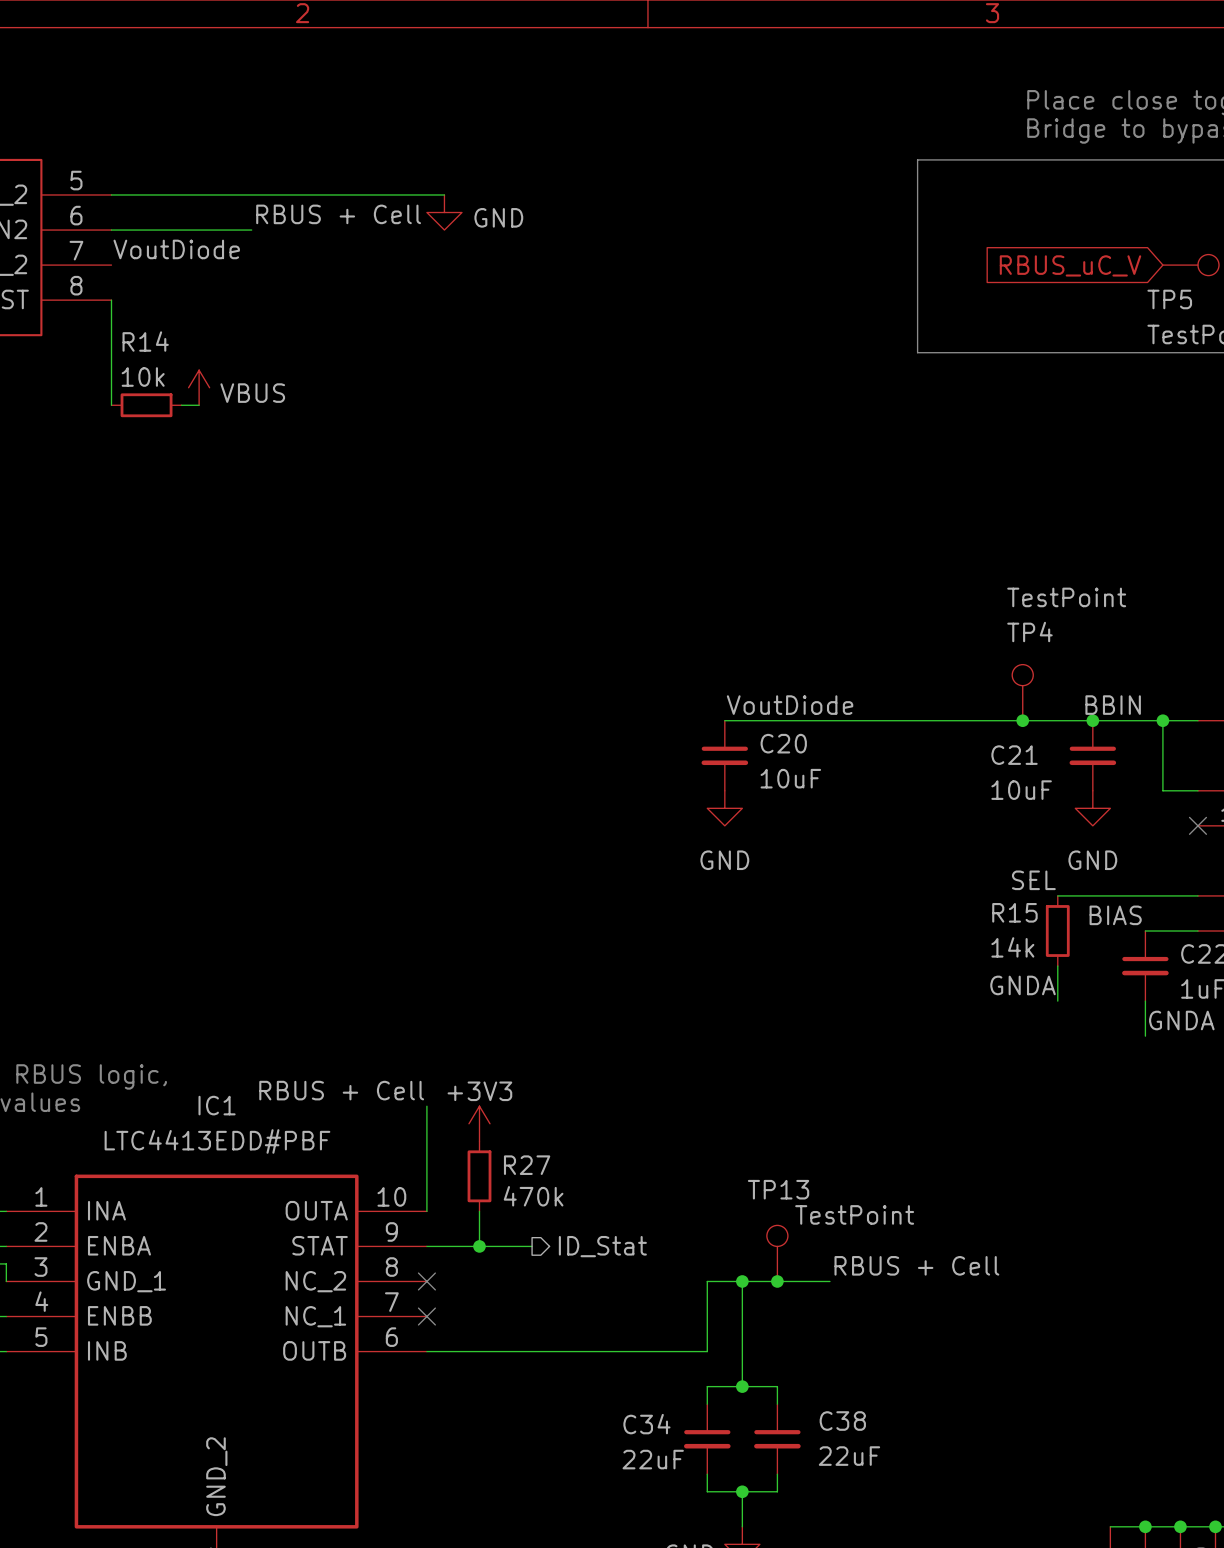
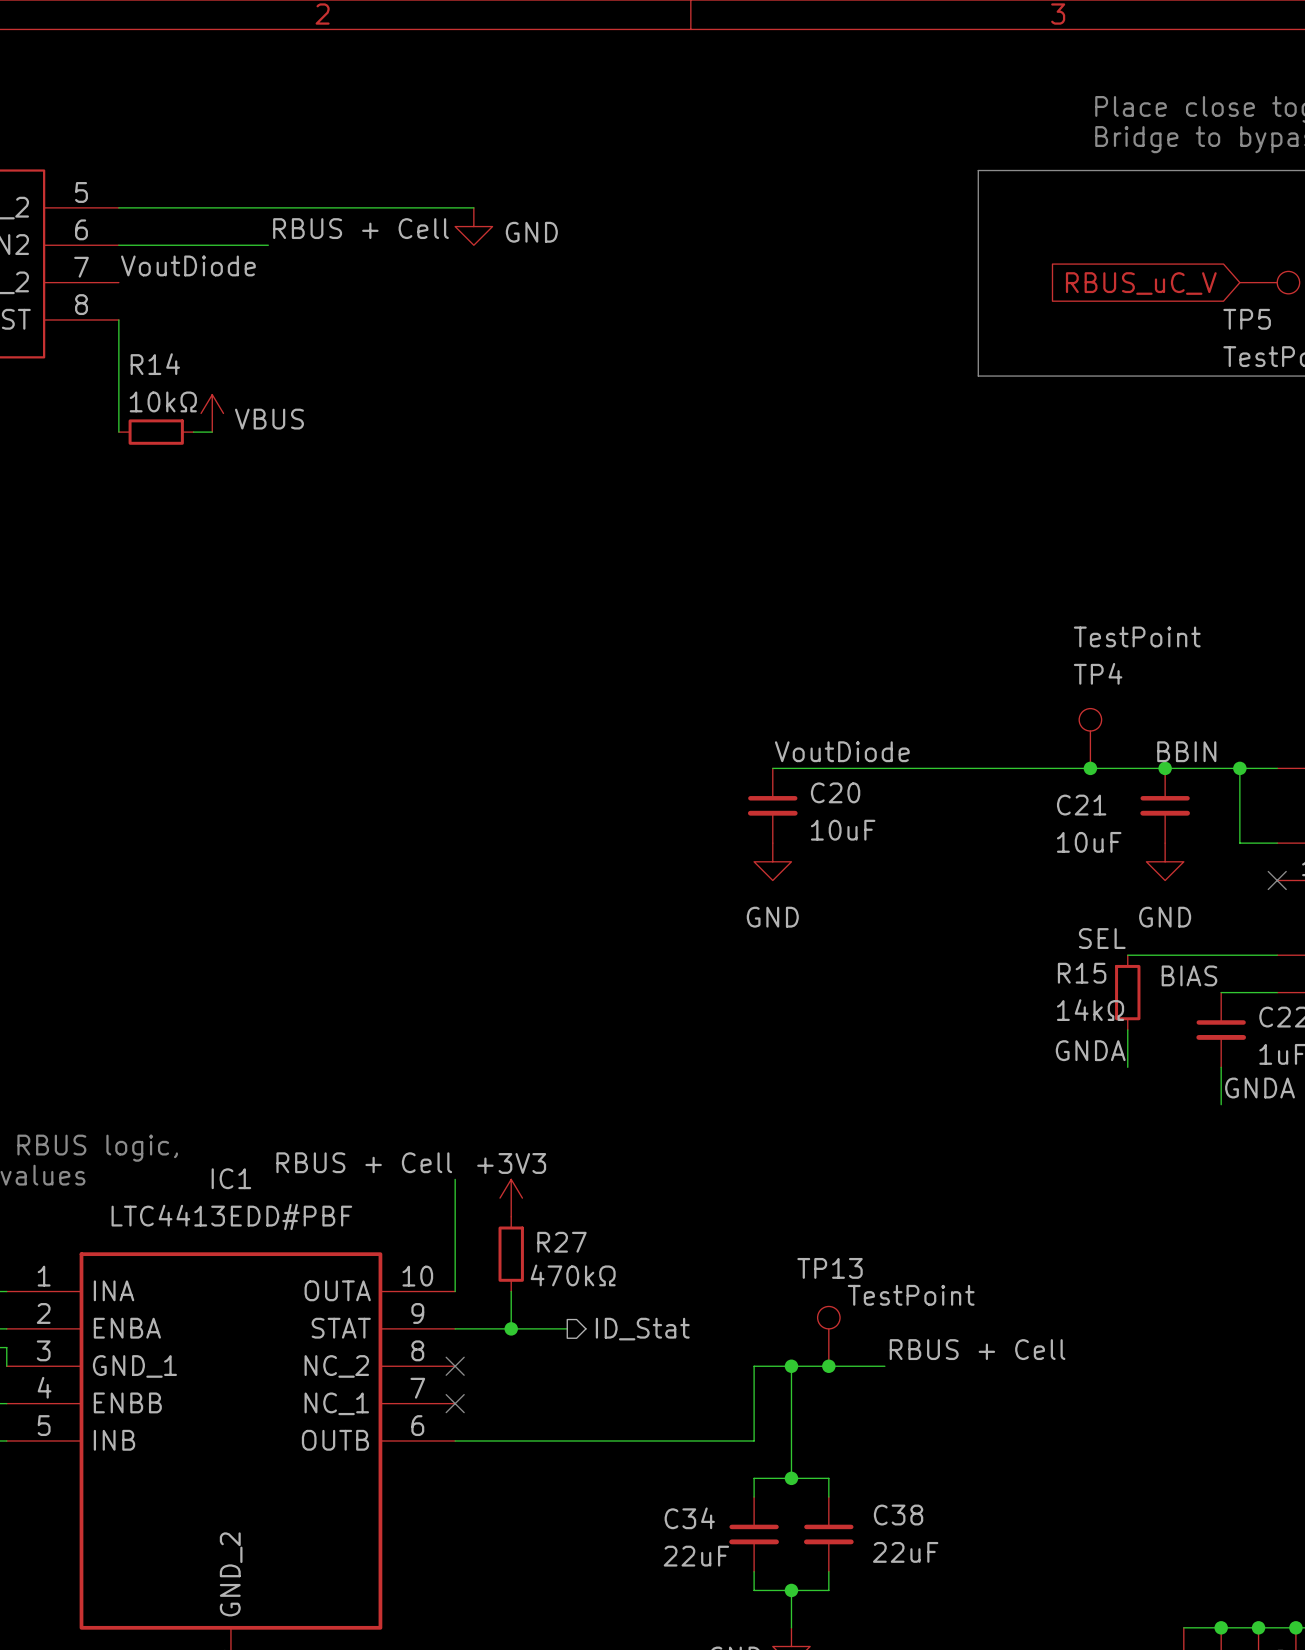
R14 value: 10k (143, 376) -> 10kΩ (163, 401)
R15 value: 14k (1012, 947) -> 14kΩ (1090, 1010)
R27 value: 470k (533, 1196) -> 470kΩ (573, 1275)

